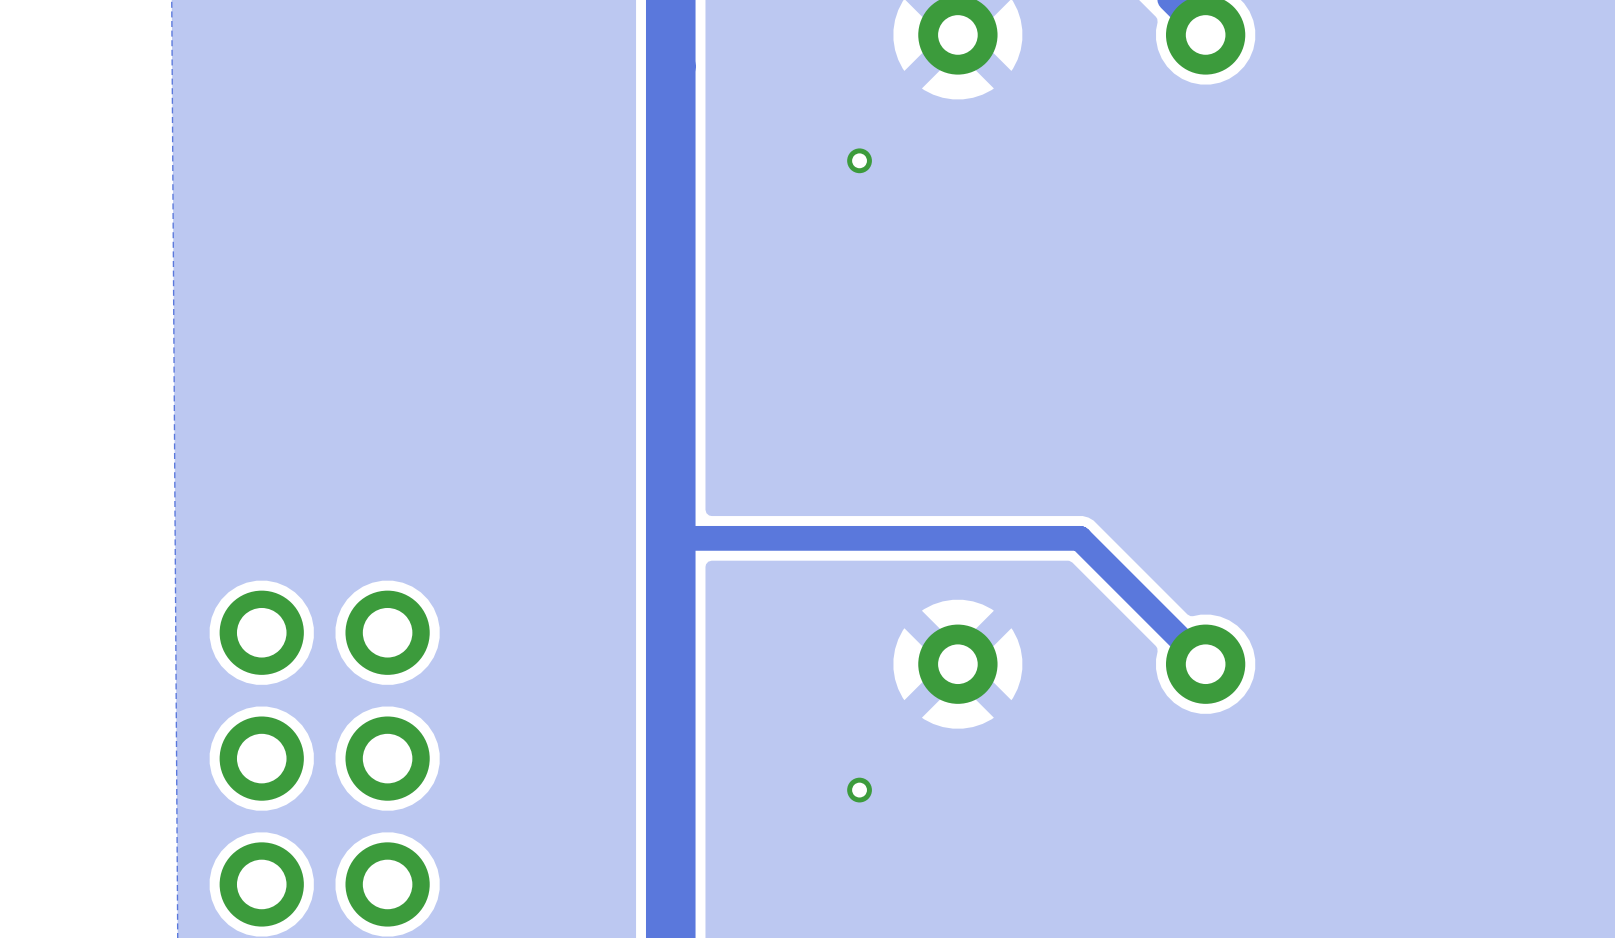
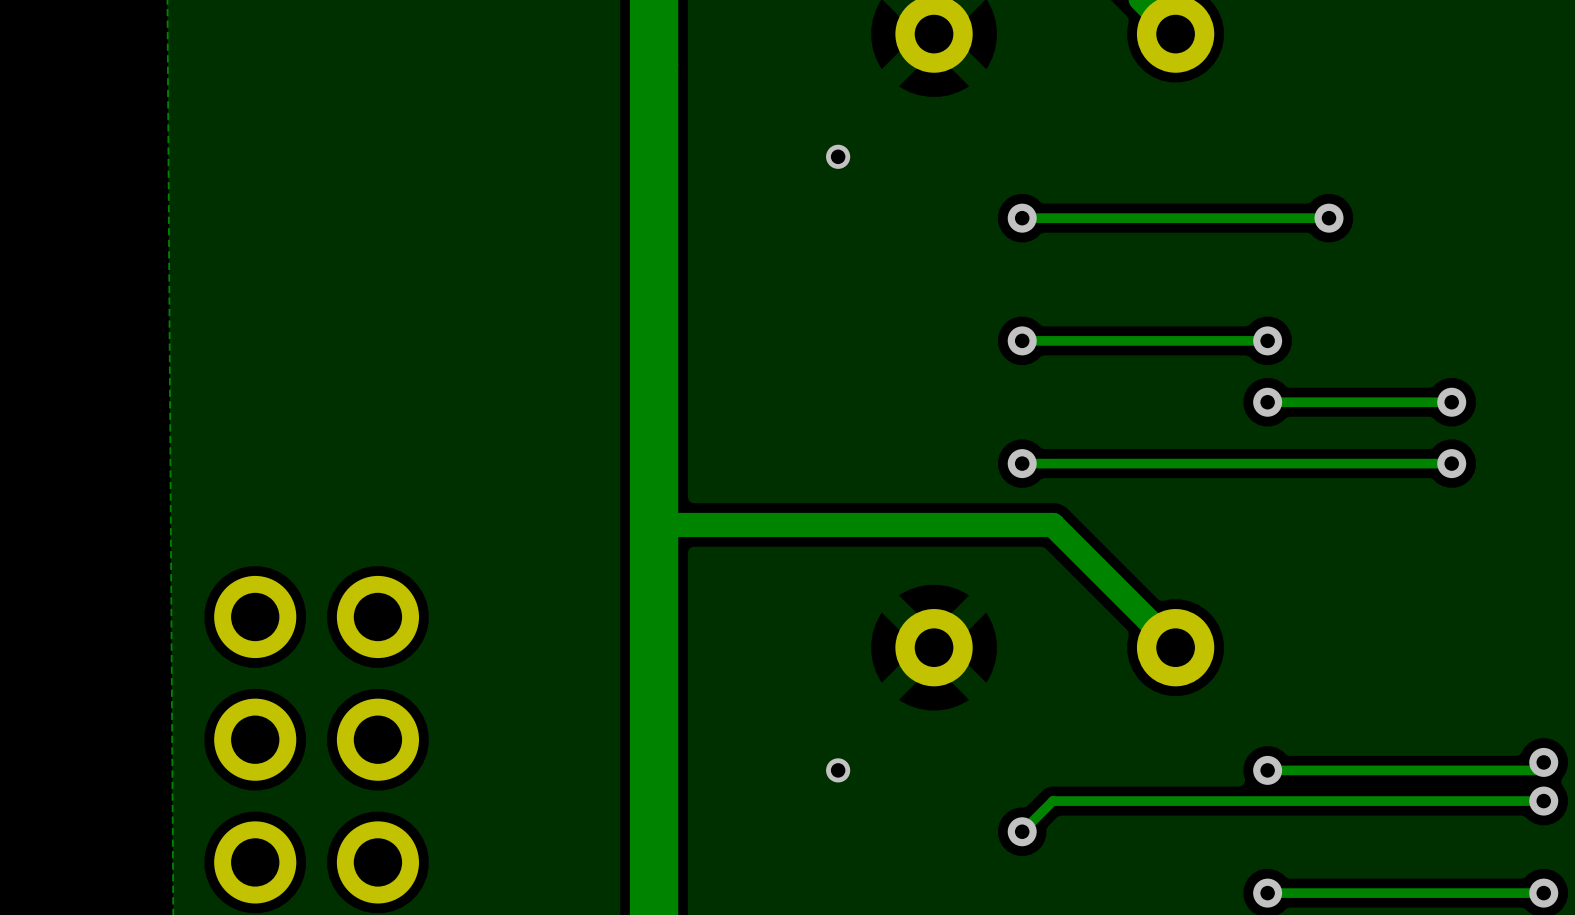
via: none -> (1022, 218)
track: none -> (1329, 218) (1022, 218)
via: none -> (1329, 218)
via: none -> (1022, 340)
track: none -> (1267, 340) (1022, 340)
via: none -> (1267, 340)
via: none -> (1267, 402)
track: none -> (1451, 402) (1267, 402)
via: none -> (1451, 402)
via: none -> (1022, 463)
track: none -> (1451, 463) (1022, 463)
via: none -> (1451, 463)
track: none -> (1543, 762) (1535, 770) (1267, 770)
via: none -> (1543, 762)
via: none -> (1267, 770)
track: none -> (1543, 801) (1052, 801) (1022, 831)
via: none -> (1543, 801)
via: none -> (1022, 831)
via: none -> (1267, 893)
track: none -> (1543, 893) (1267, 893)
via: none -> (1543, 893)

